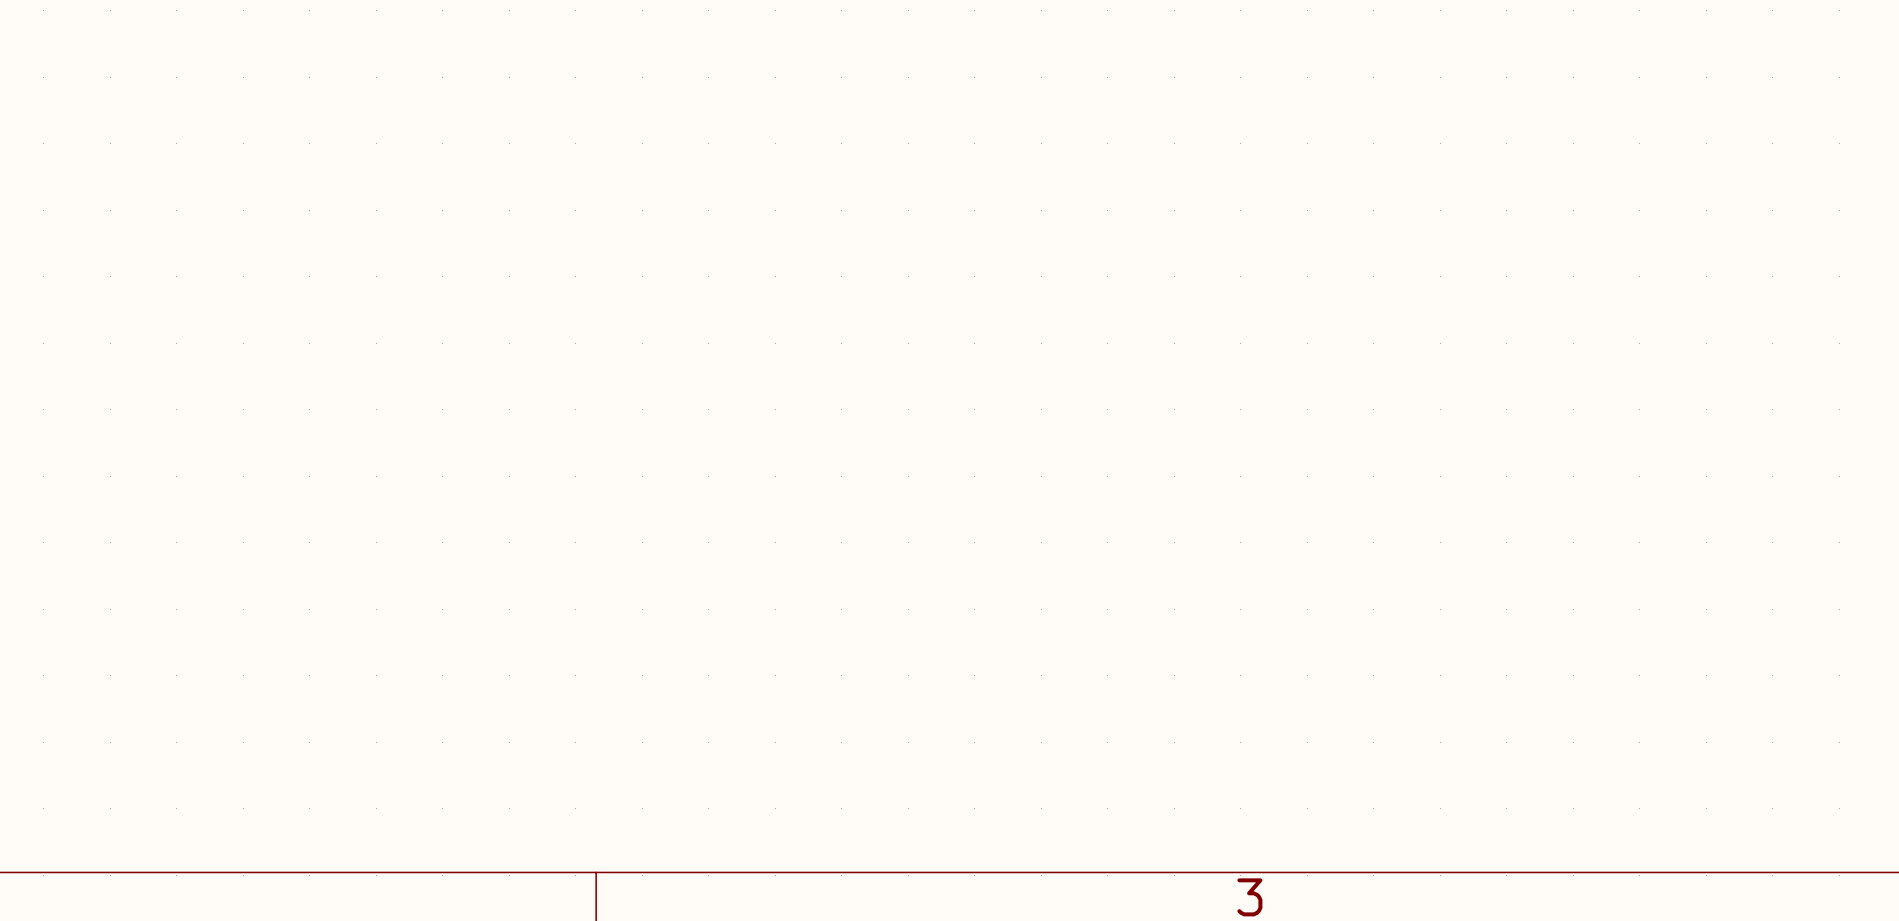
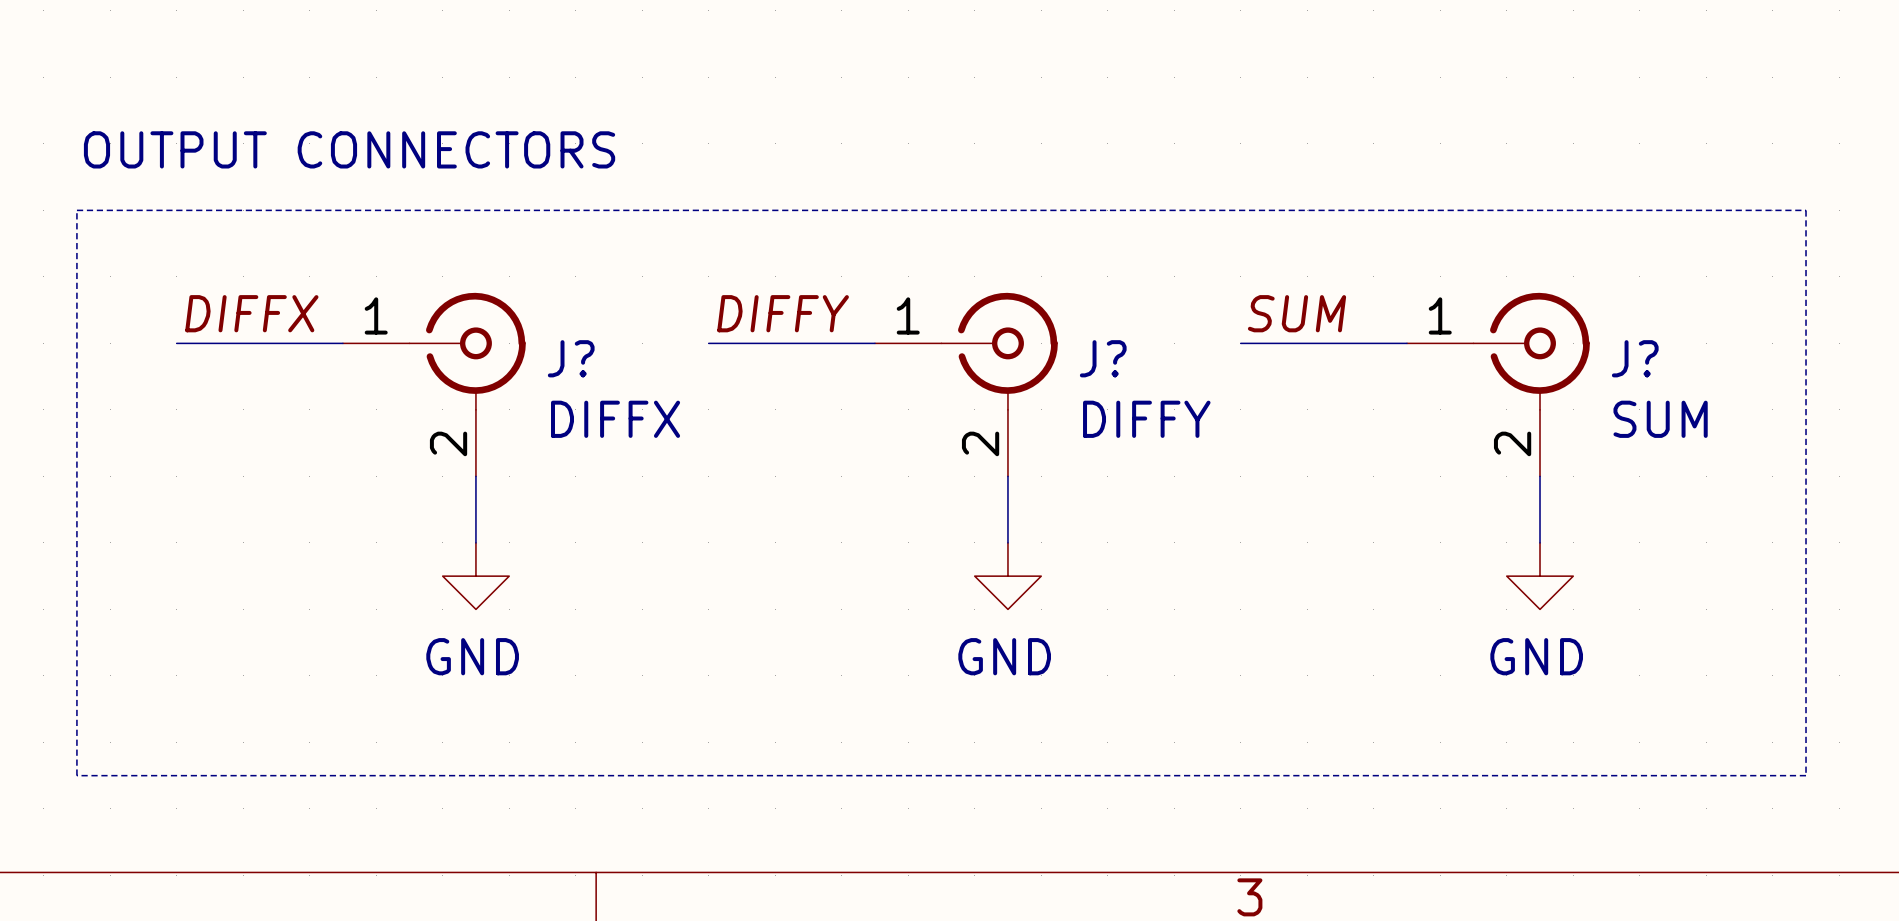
text: none -> OUTPUT CONNECTORS (349, 149)
line: none -> (76, 210) (1806, 210) (1806, 775) (76, 775) (76, 210)
label: none -> DIFFX (251, 313)
label: none -> DIFFY (783, 313)
label: none -> SUM (1297, 313)
wire: none -> (176, 343) (342, 343)
wire: none -> (708, 343) (874, 343)
wire: none -> (1240, 343) (1406, 343)
J?: none -> DIFFX (434, 384)
J?: none -> DIFFY (966, 384)
J?: none -> SUM (1498, 384)
wire: none -> (475, 476) (475, 542)
wire: none -> (1007, 476) (1007, 542)
wire: none -> (1540, 476) (1540, 542)
power symbol: none -> GND (475, 576)
power symbol: none -> GND (1007, 576)
power symbol: none -> GND (1540, 576)

